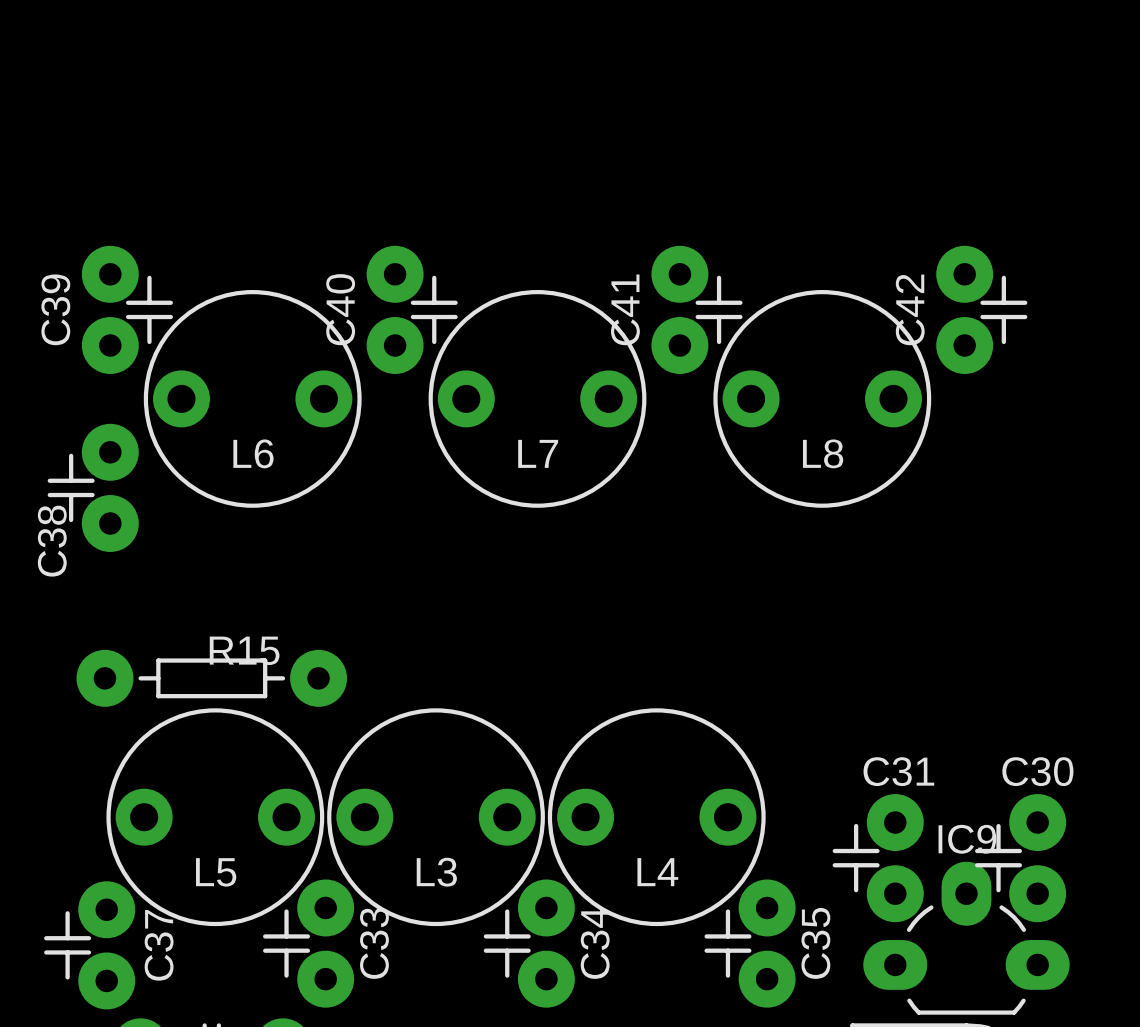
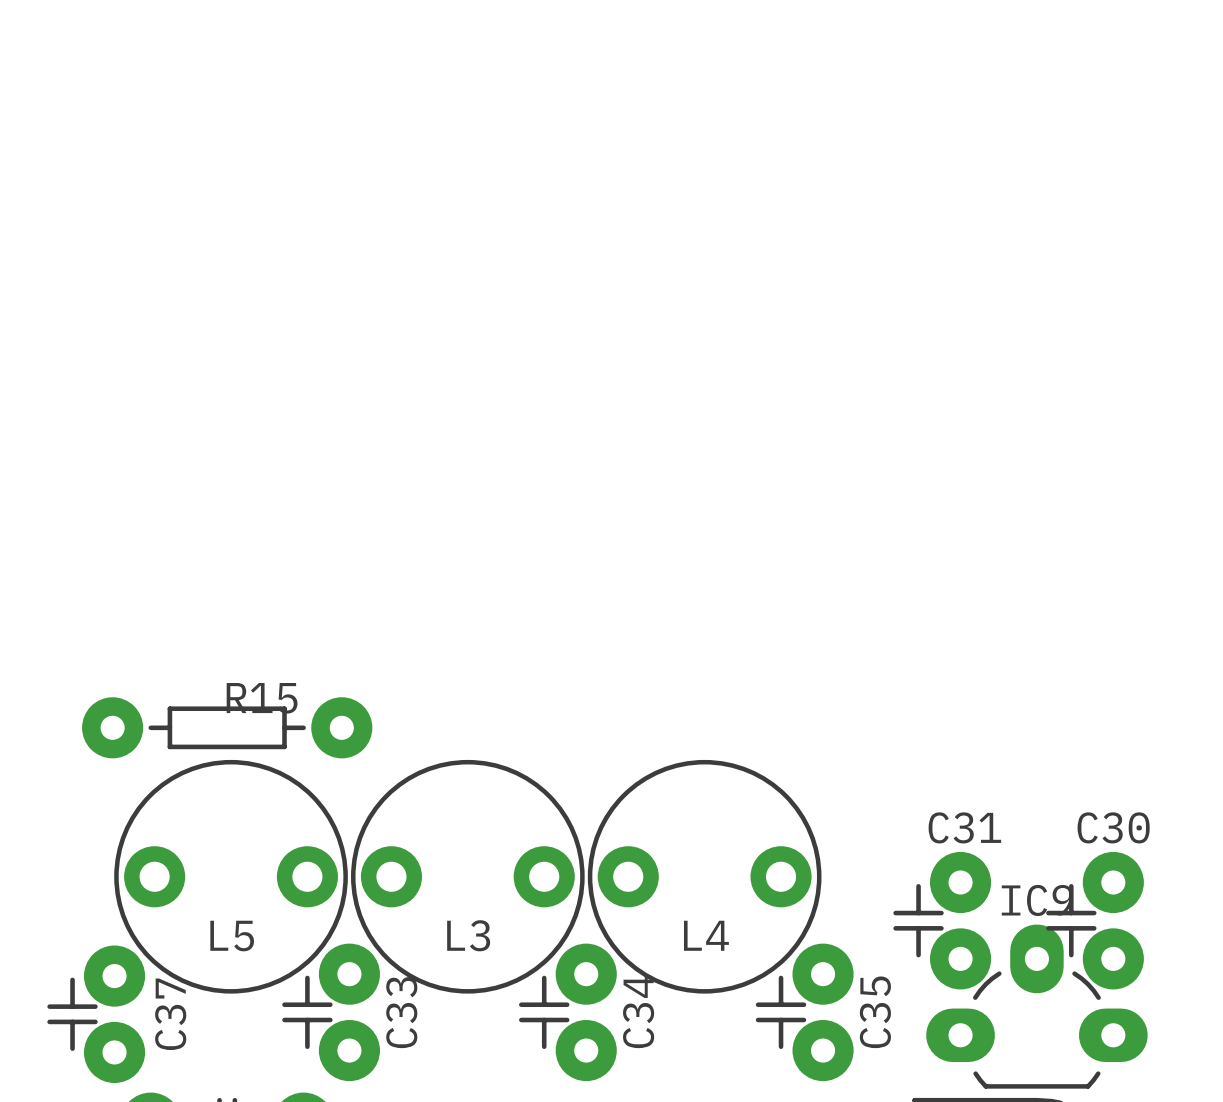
C39: (127, 309) -> none
C40: (412, 309) -> none
C41: (696, 309) -> none
C42: (981, 309) -> none
L6: (252, 398) -> none
L7: (537, 398) -> none
L8: (822, 398) -> none
C38: (93, 487) -> none

